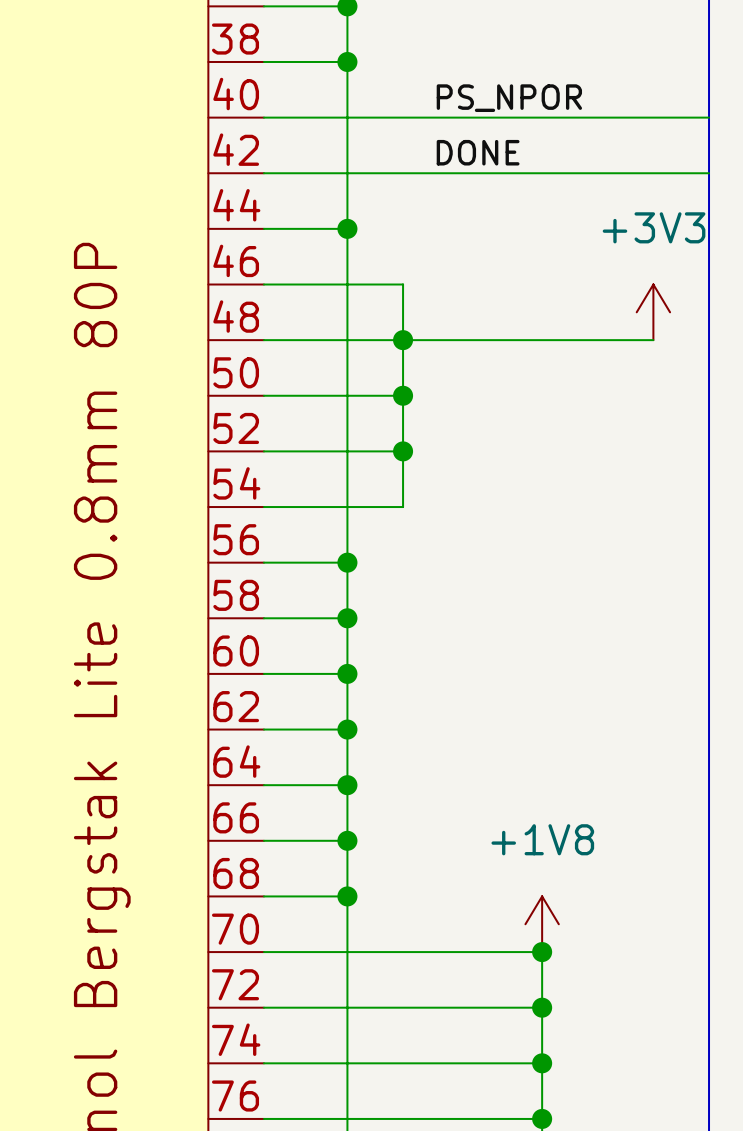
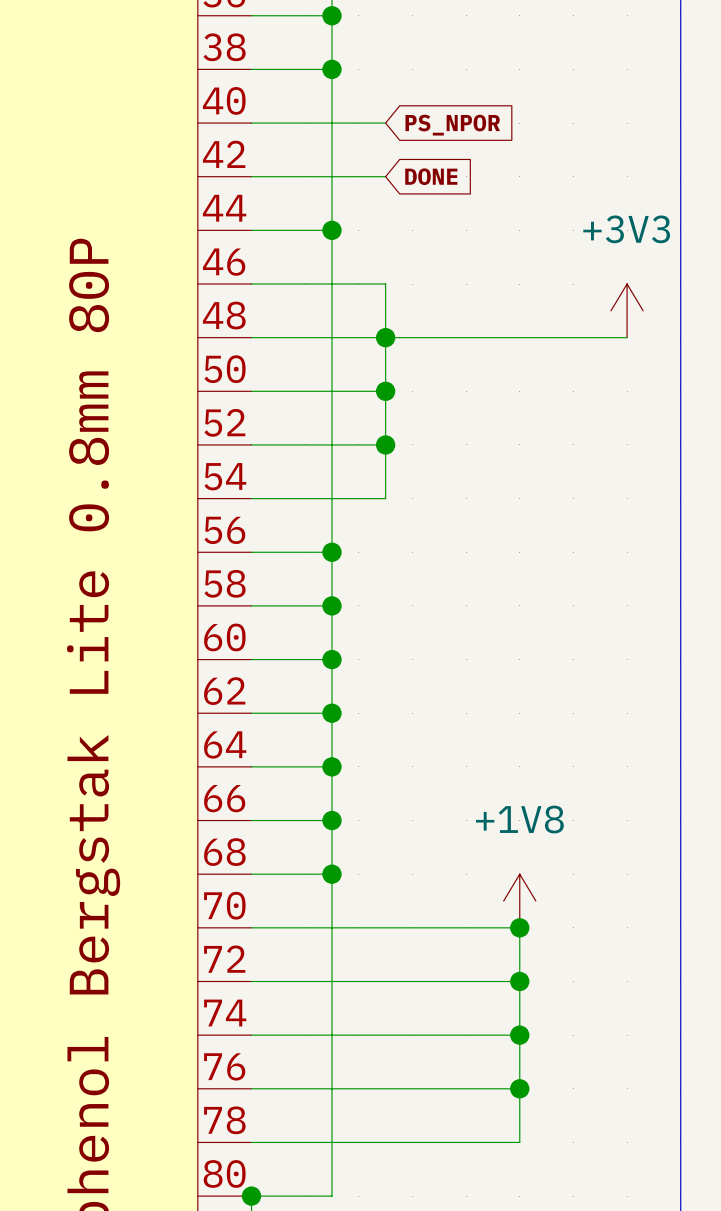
label: PS_NPOR (509, 98) -> none
wire: (403, 117) (709, 117) -> none
global label: none -> PS_NPOR (452, 125)
label: DONE (478, 152) -> none
wire: (403, 173) (709, 173) -> none
global label: none -> DONE (431, 176)

